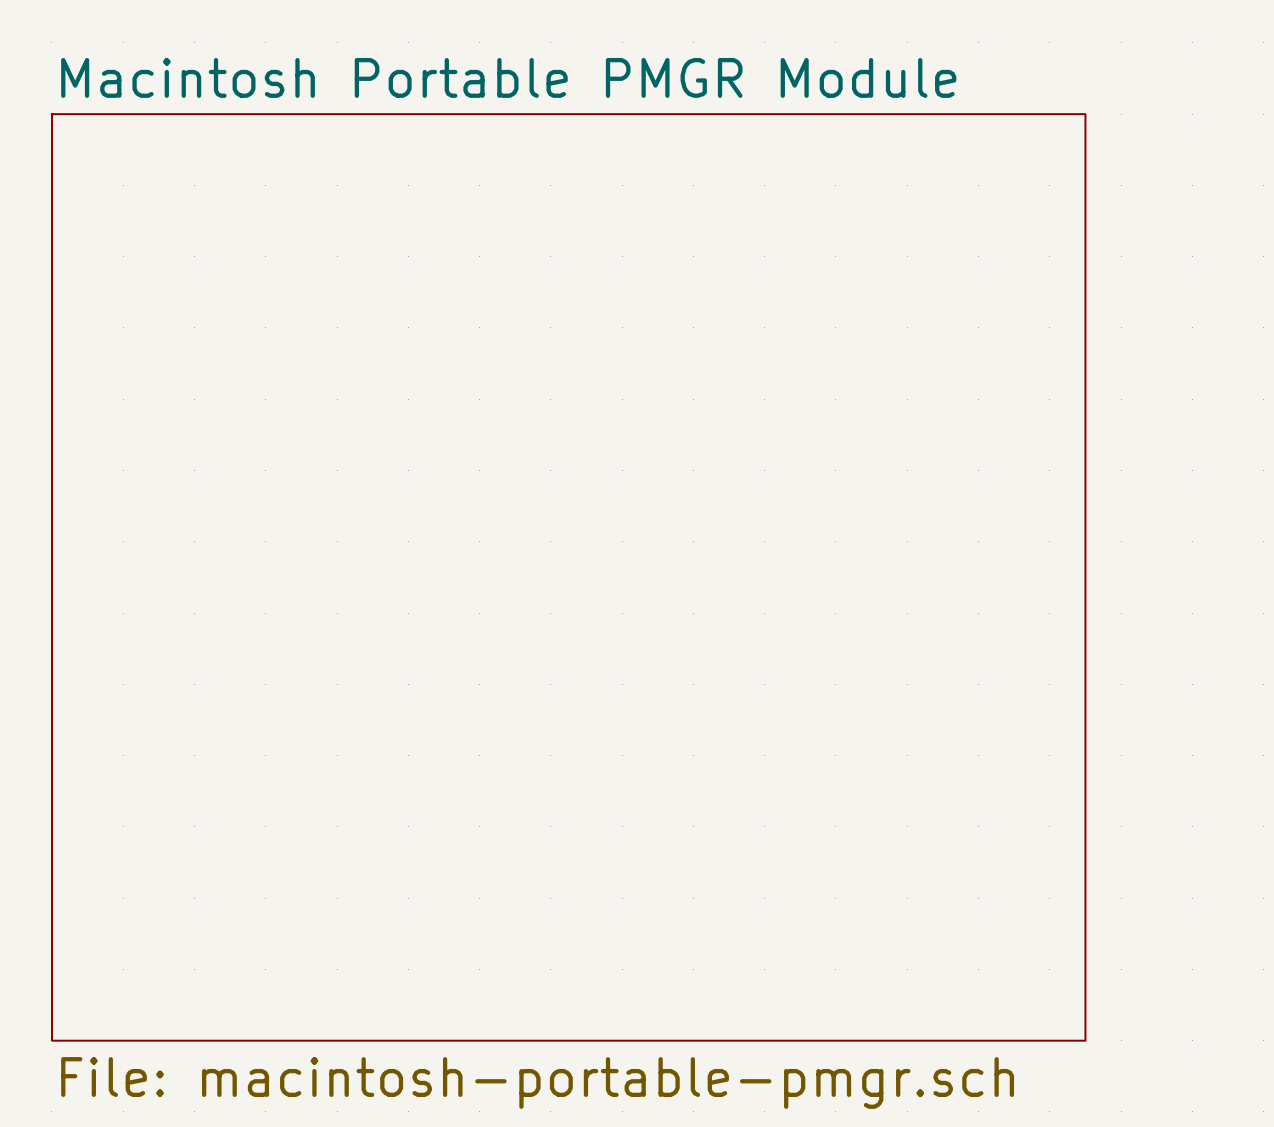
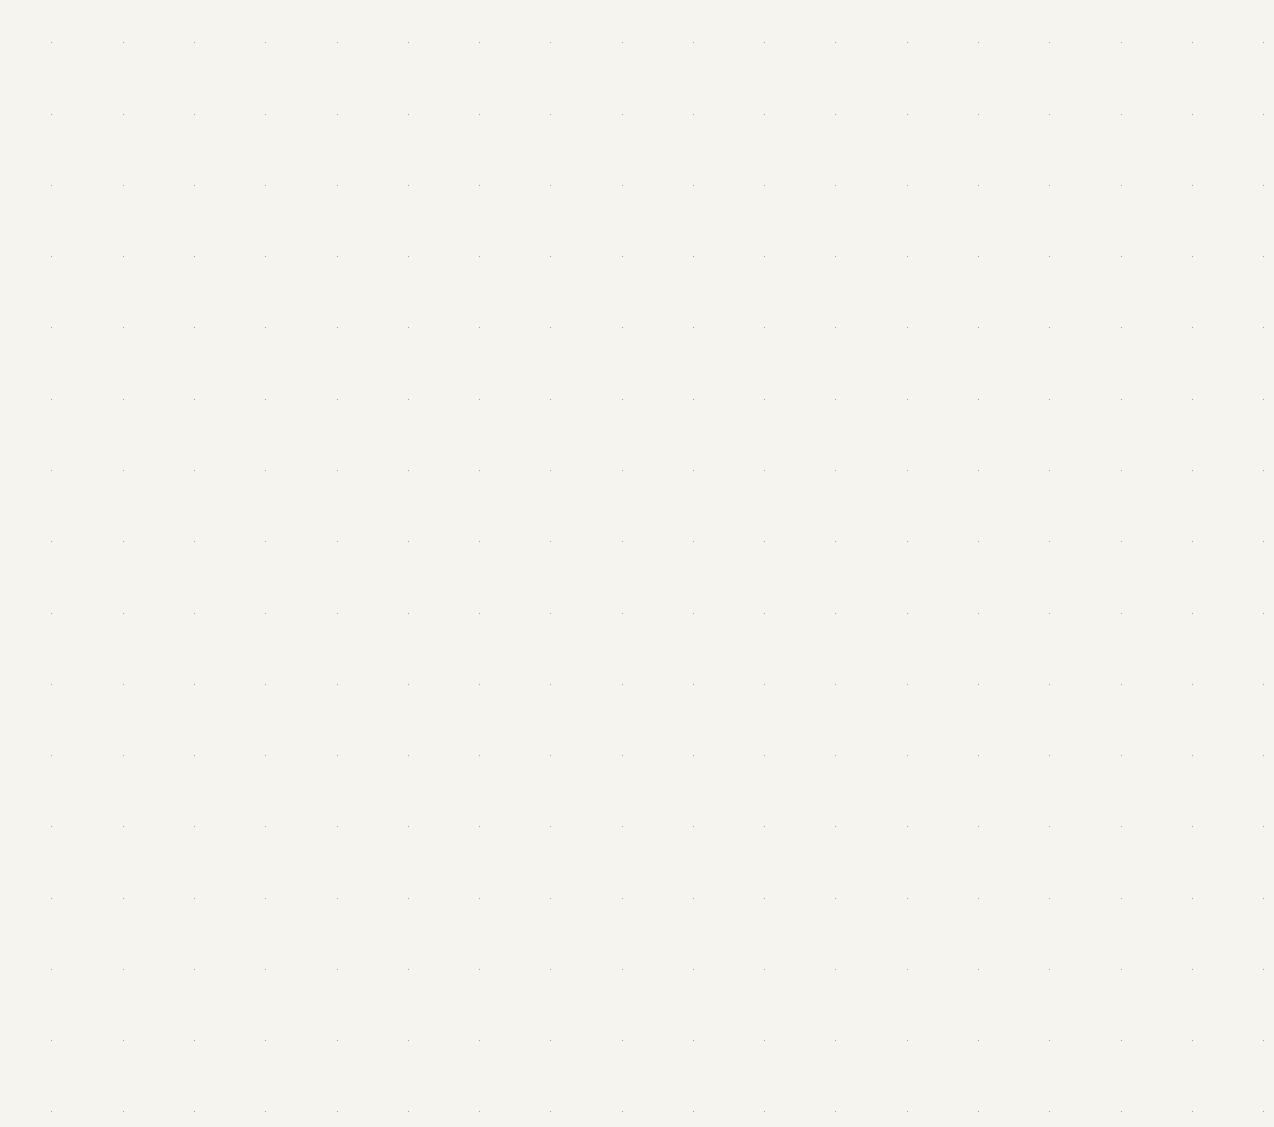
sheet Macintosh Portable PMGR Module: File: macintosh-portable-pmgr.sch (568, 577) -> none

